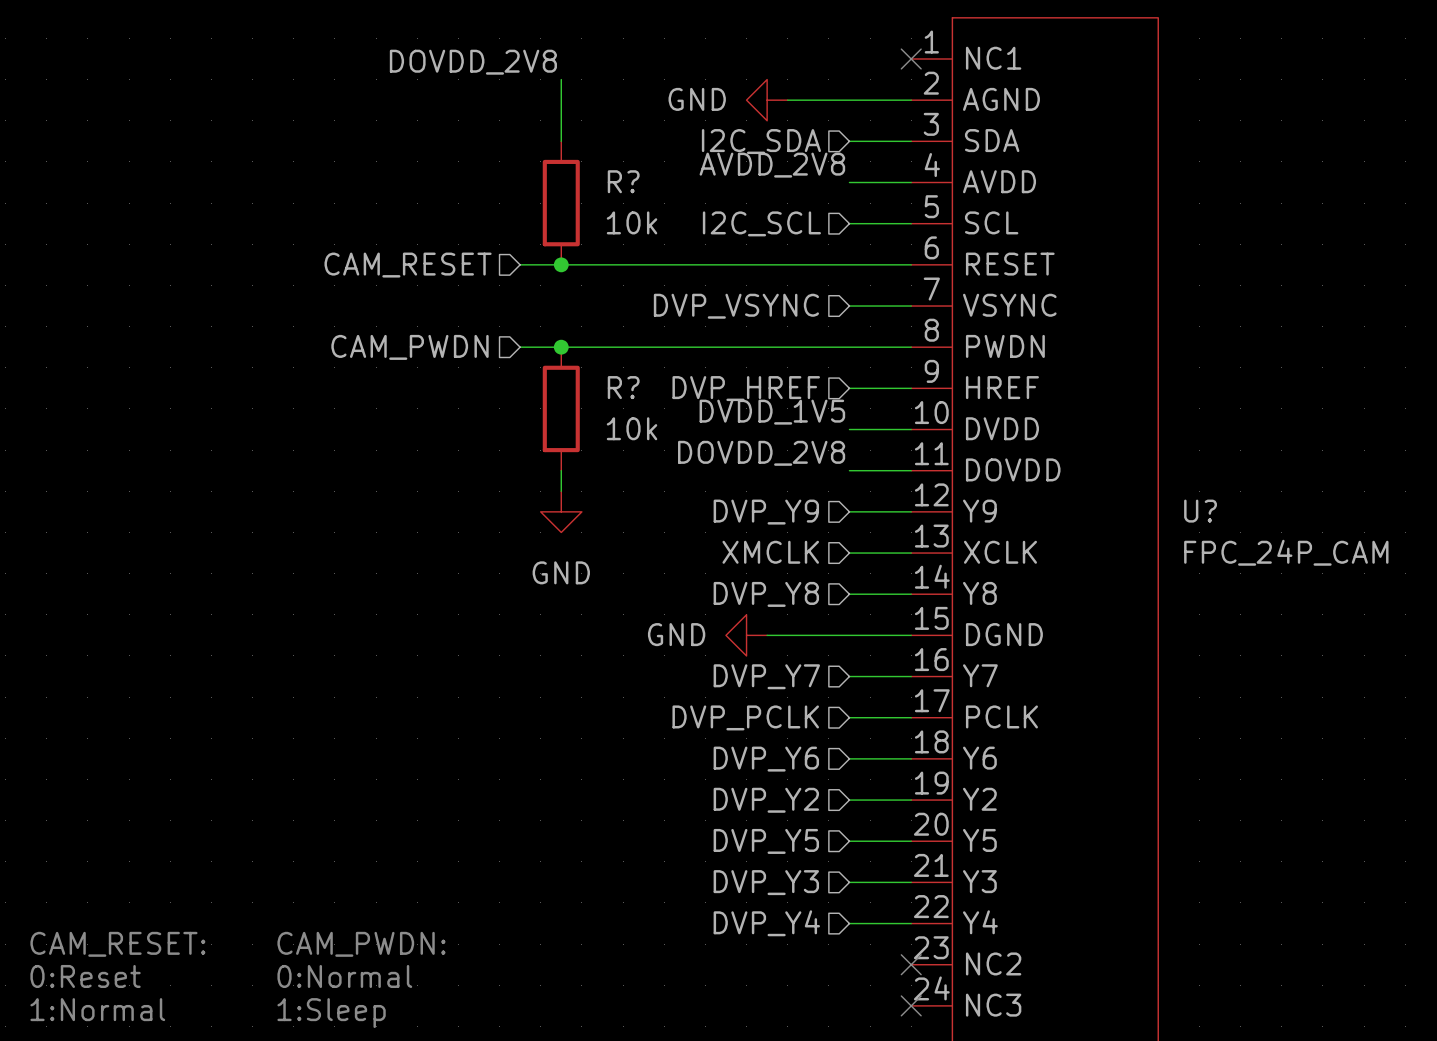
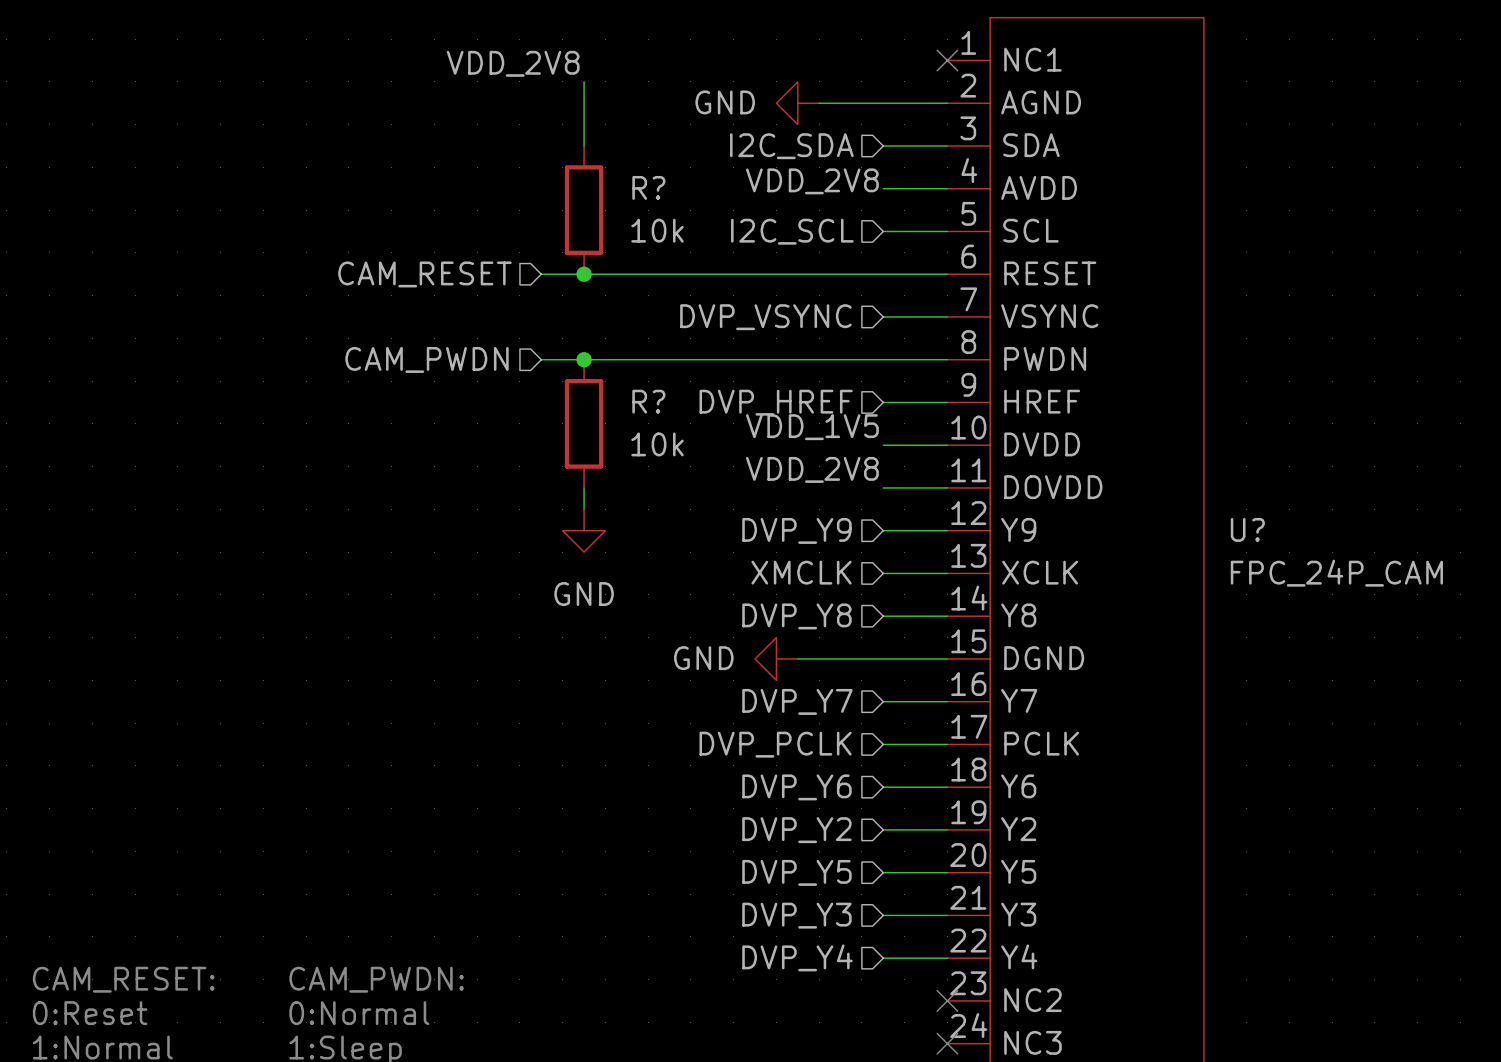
label: DOVDD_2V8 (473, 62) -> VDD_2V8 (513, 63)
label: AVDD_2V8 (772, 165) -> VDD_2V8 (812, 181)
label: DVDD_1V5 (772, 412) -> VDD_1V5 (812, 427)
label: DOVDD_2V8 (761, 453) -> VDD_2V8 (812, 469)

